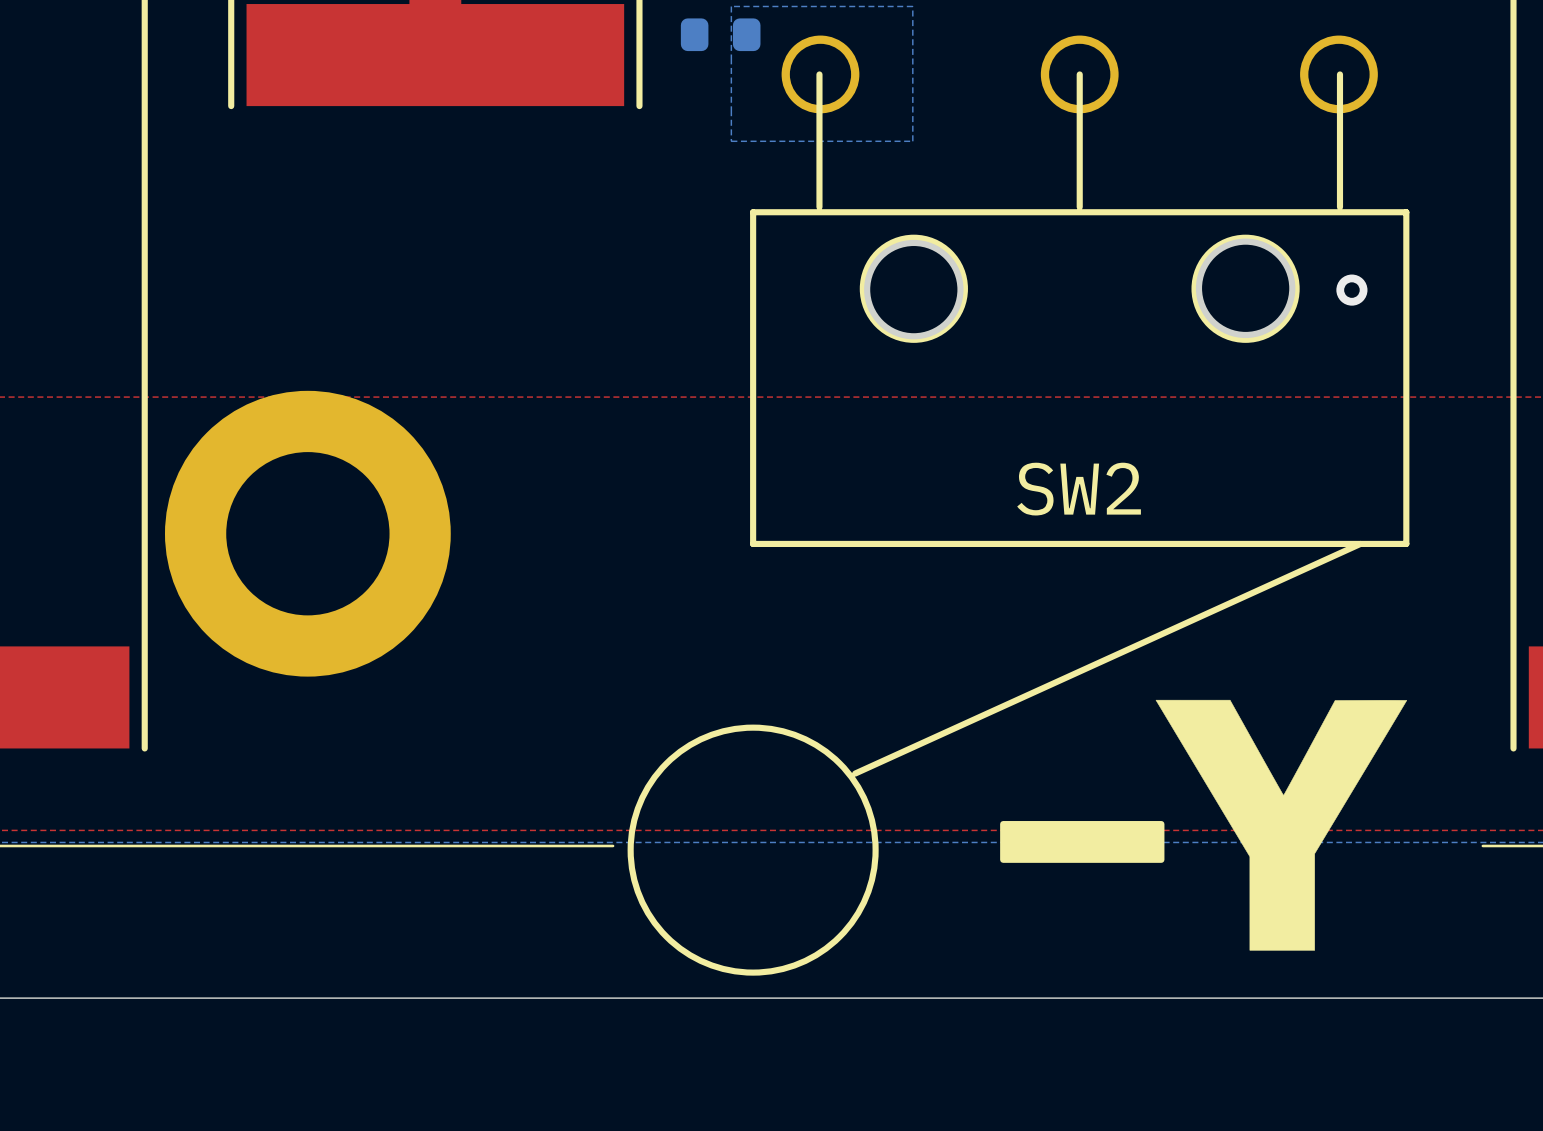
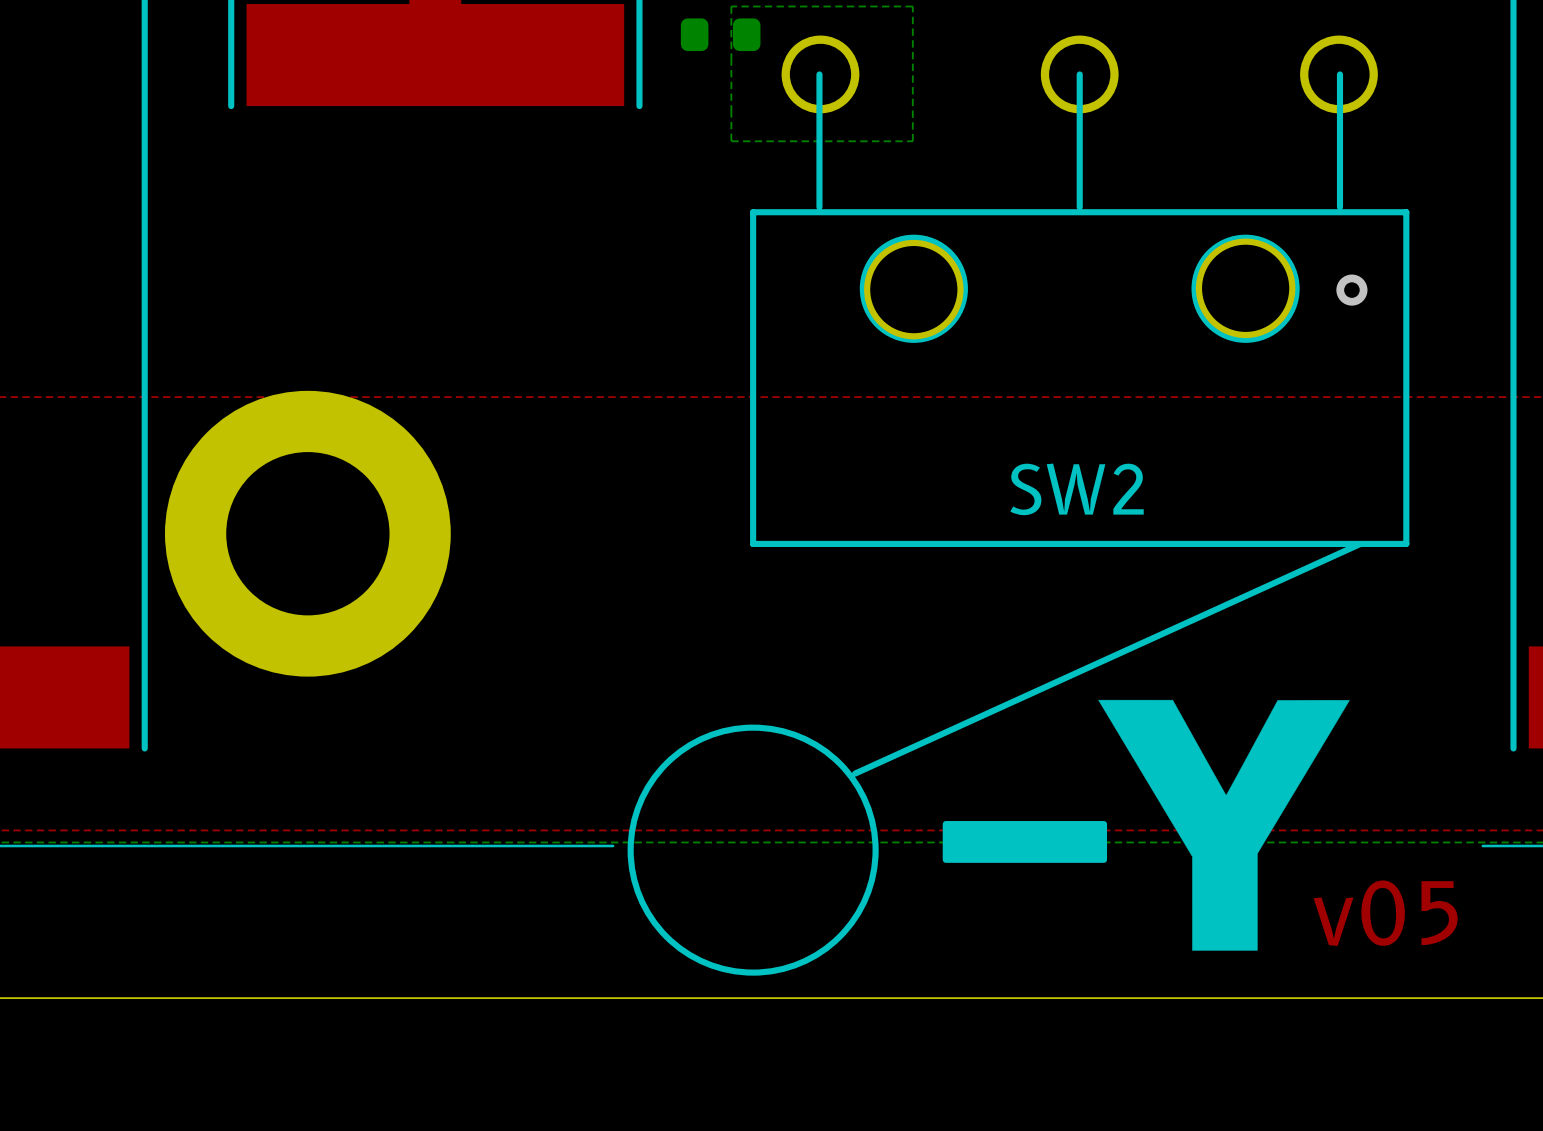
drawing position: (1203, 825) -> (1146, 825)
text: none -> v05 (1385, 913)

